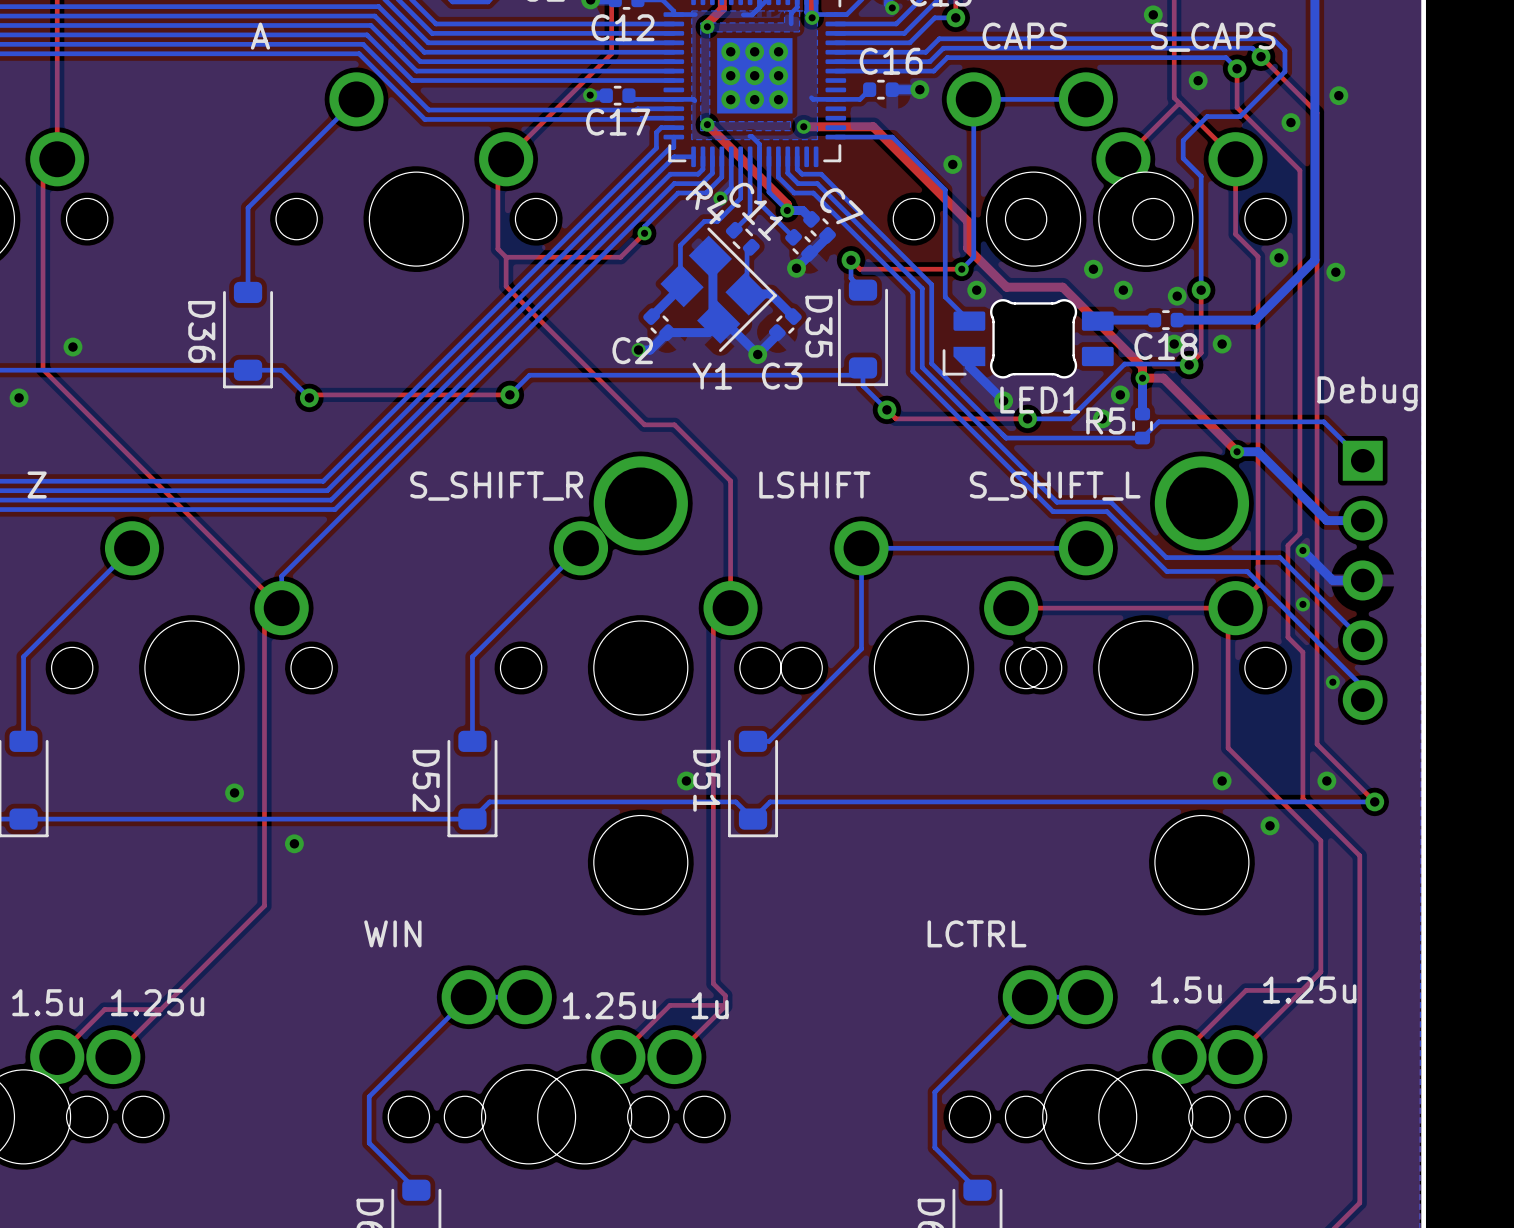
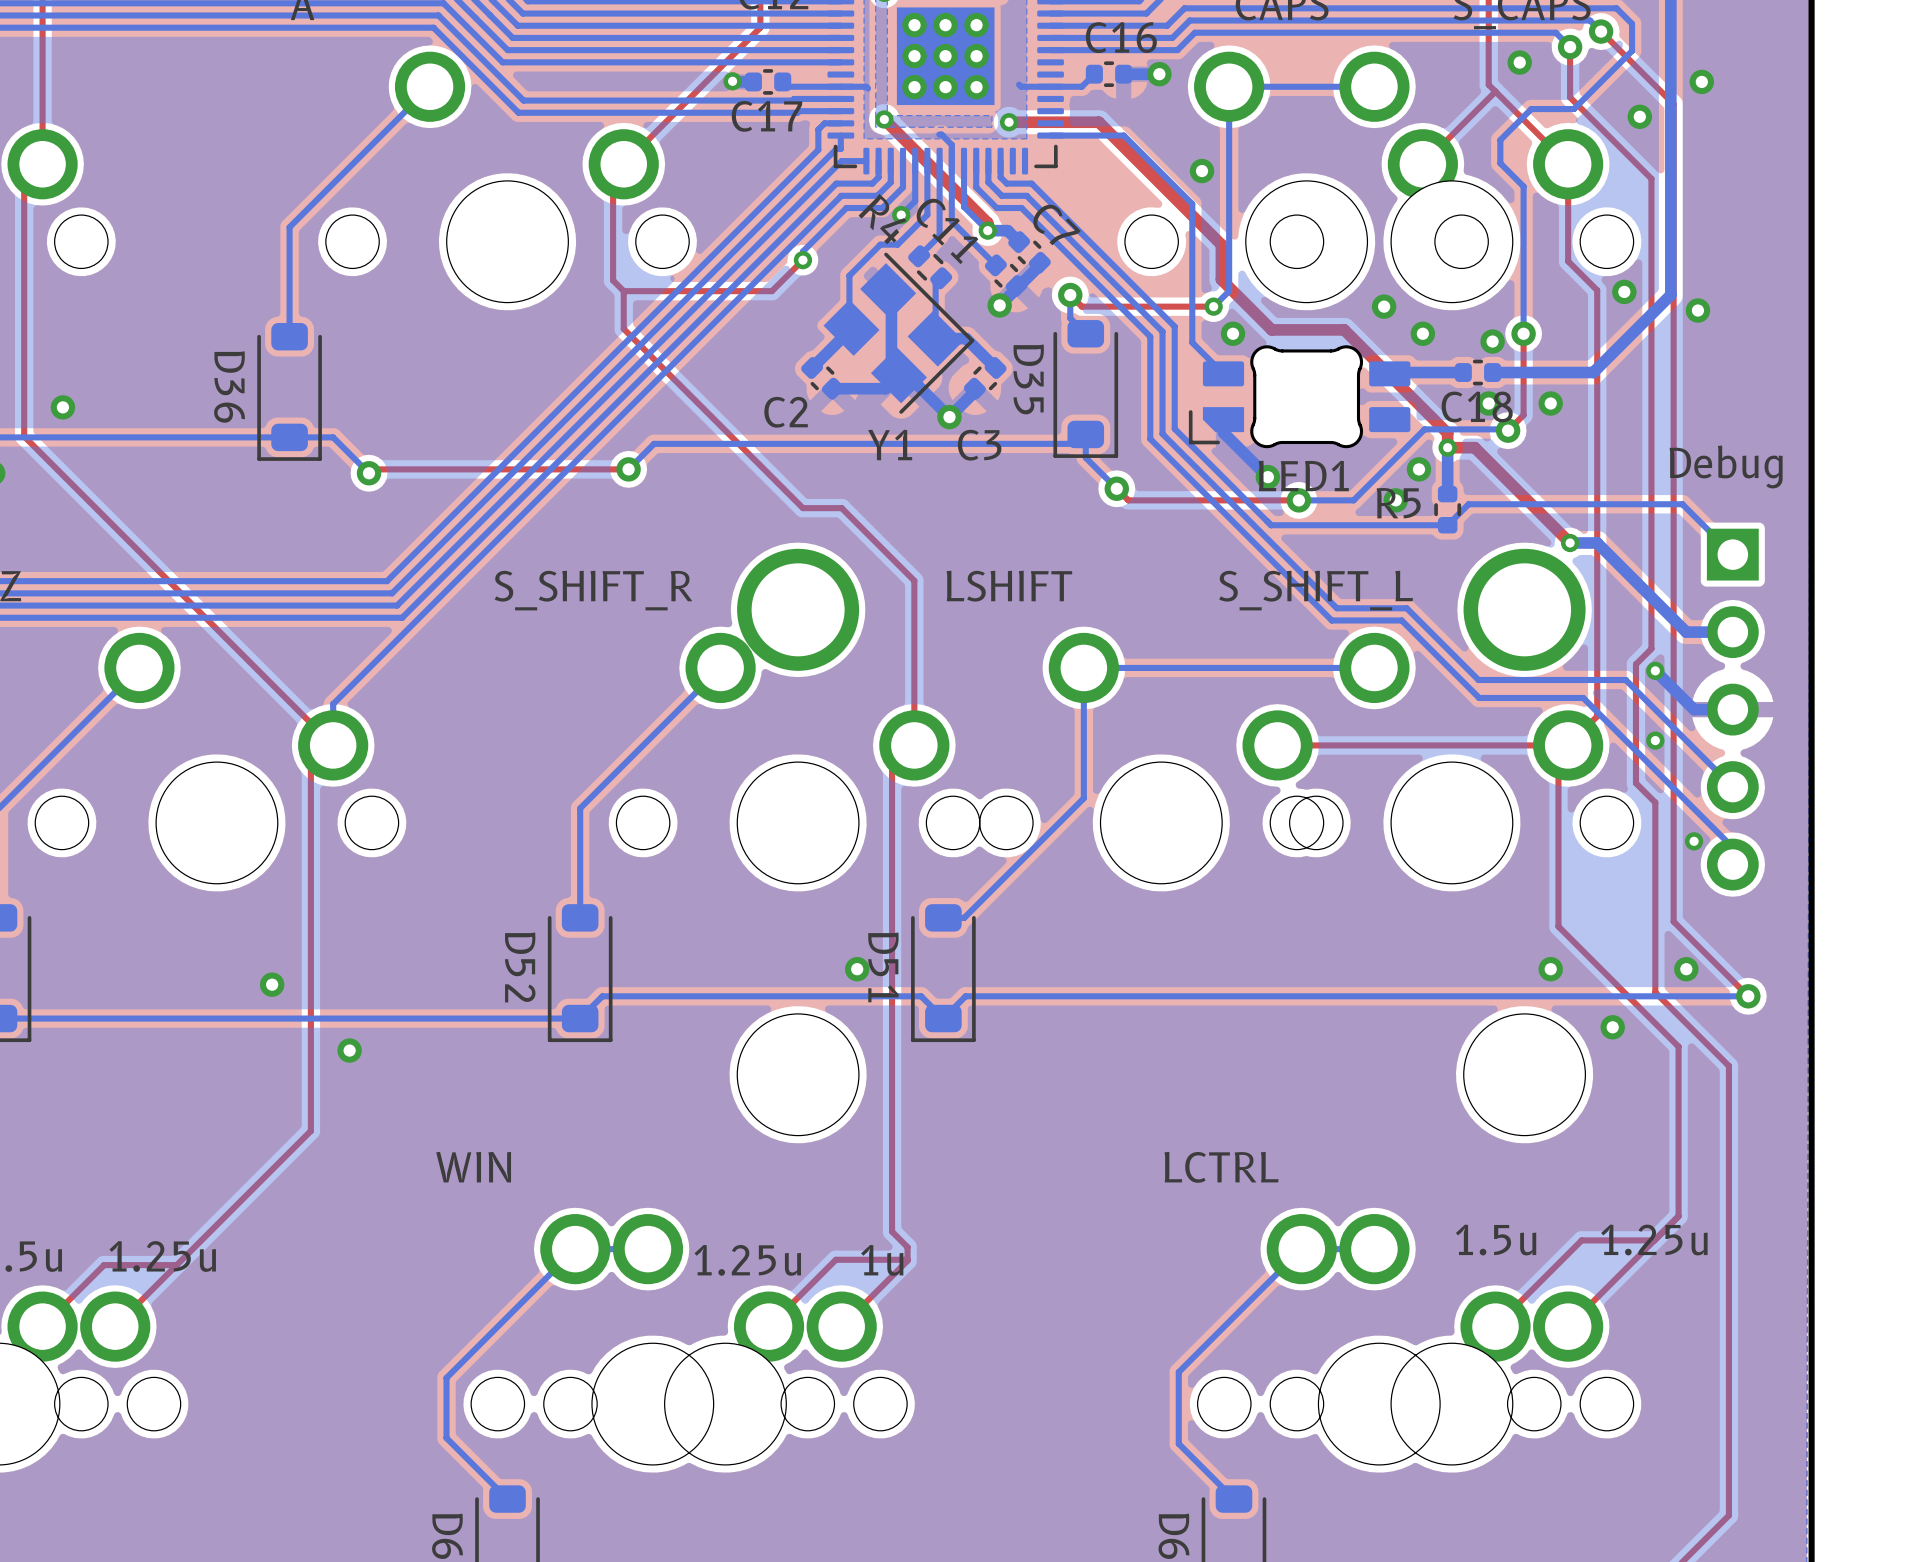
bottom track: (667, 332) (650, 350) (638, 350) -> none
via: (638, 350) -> none

